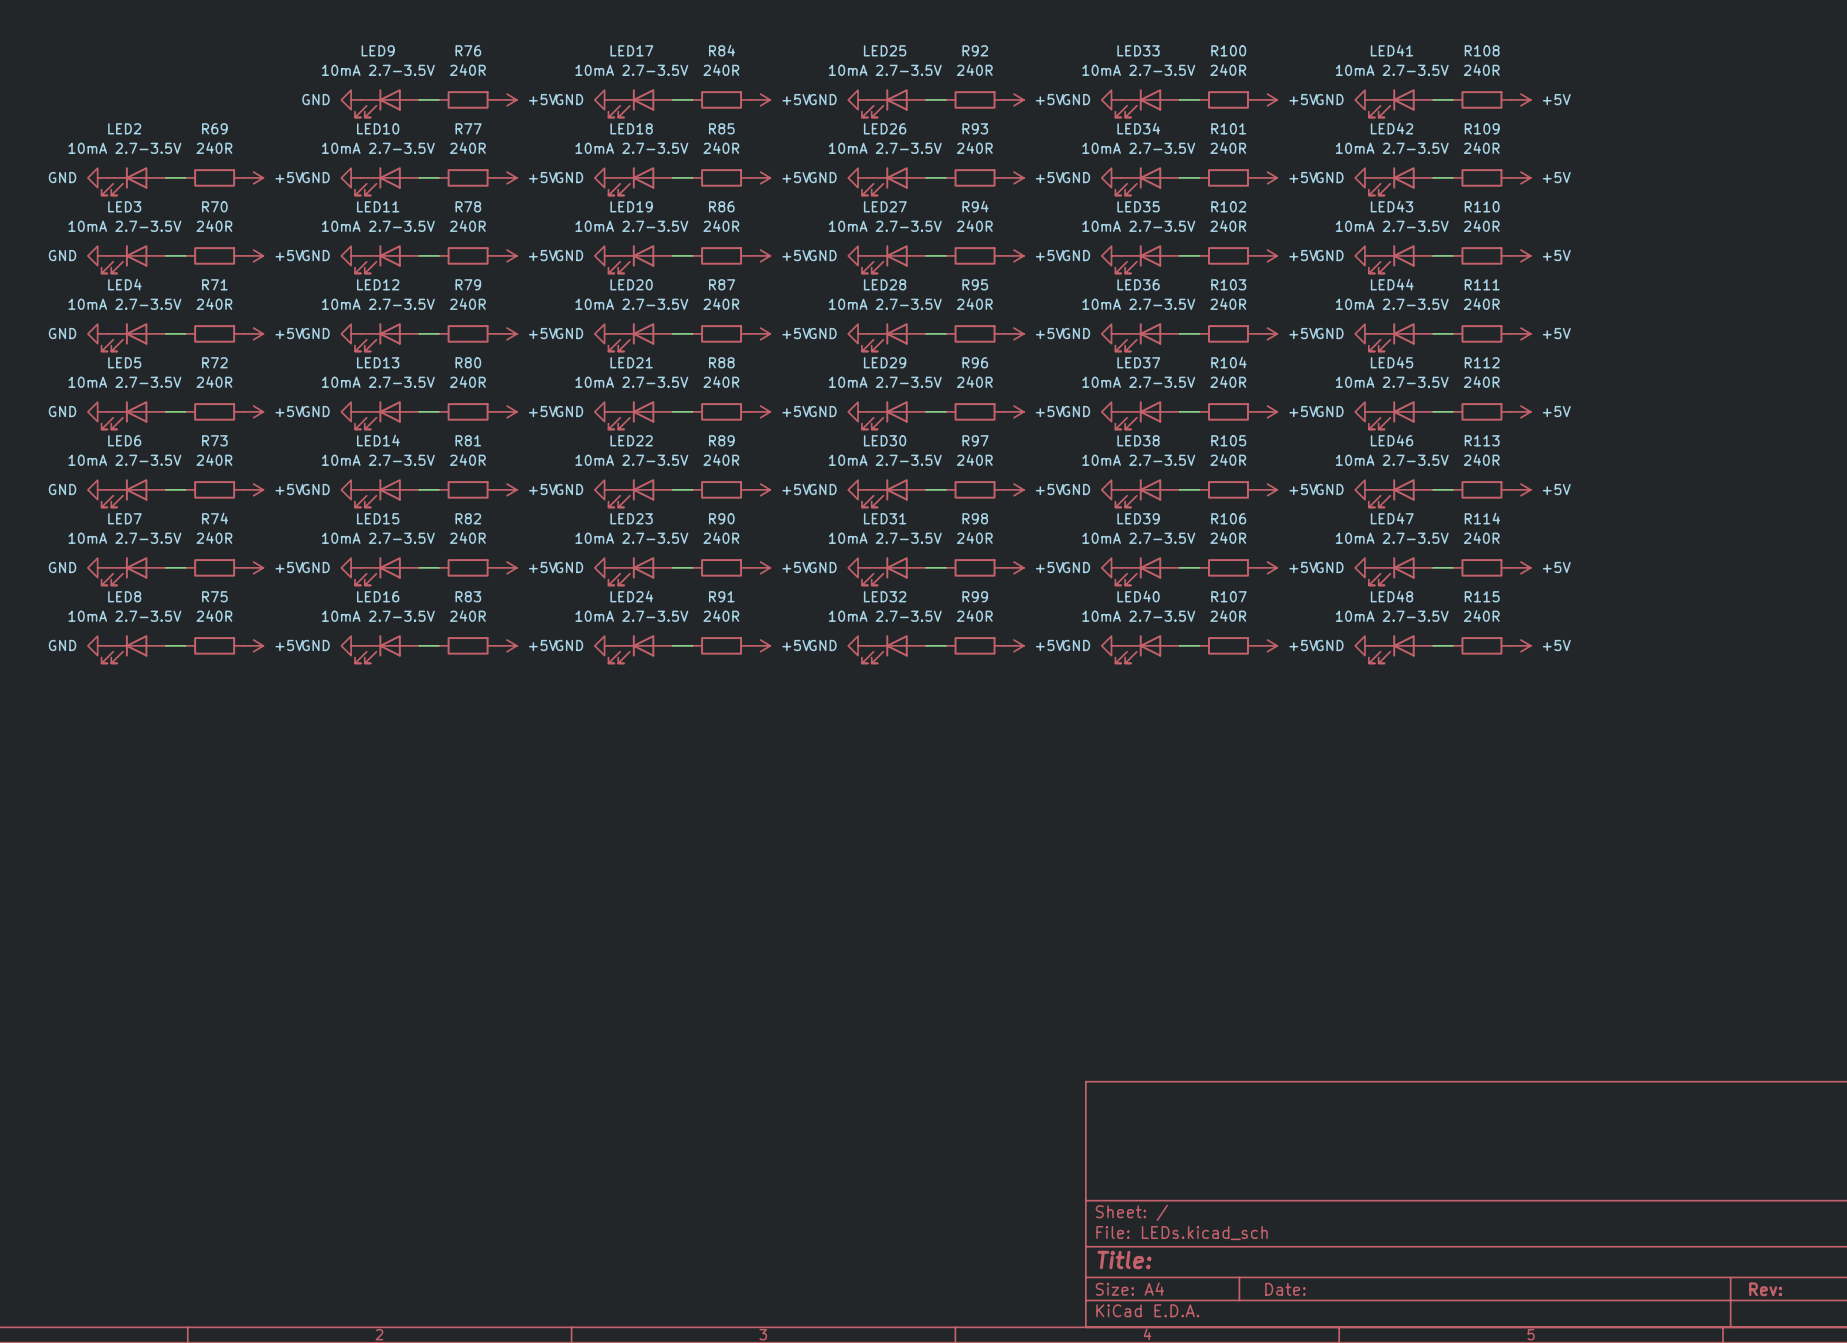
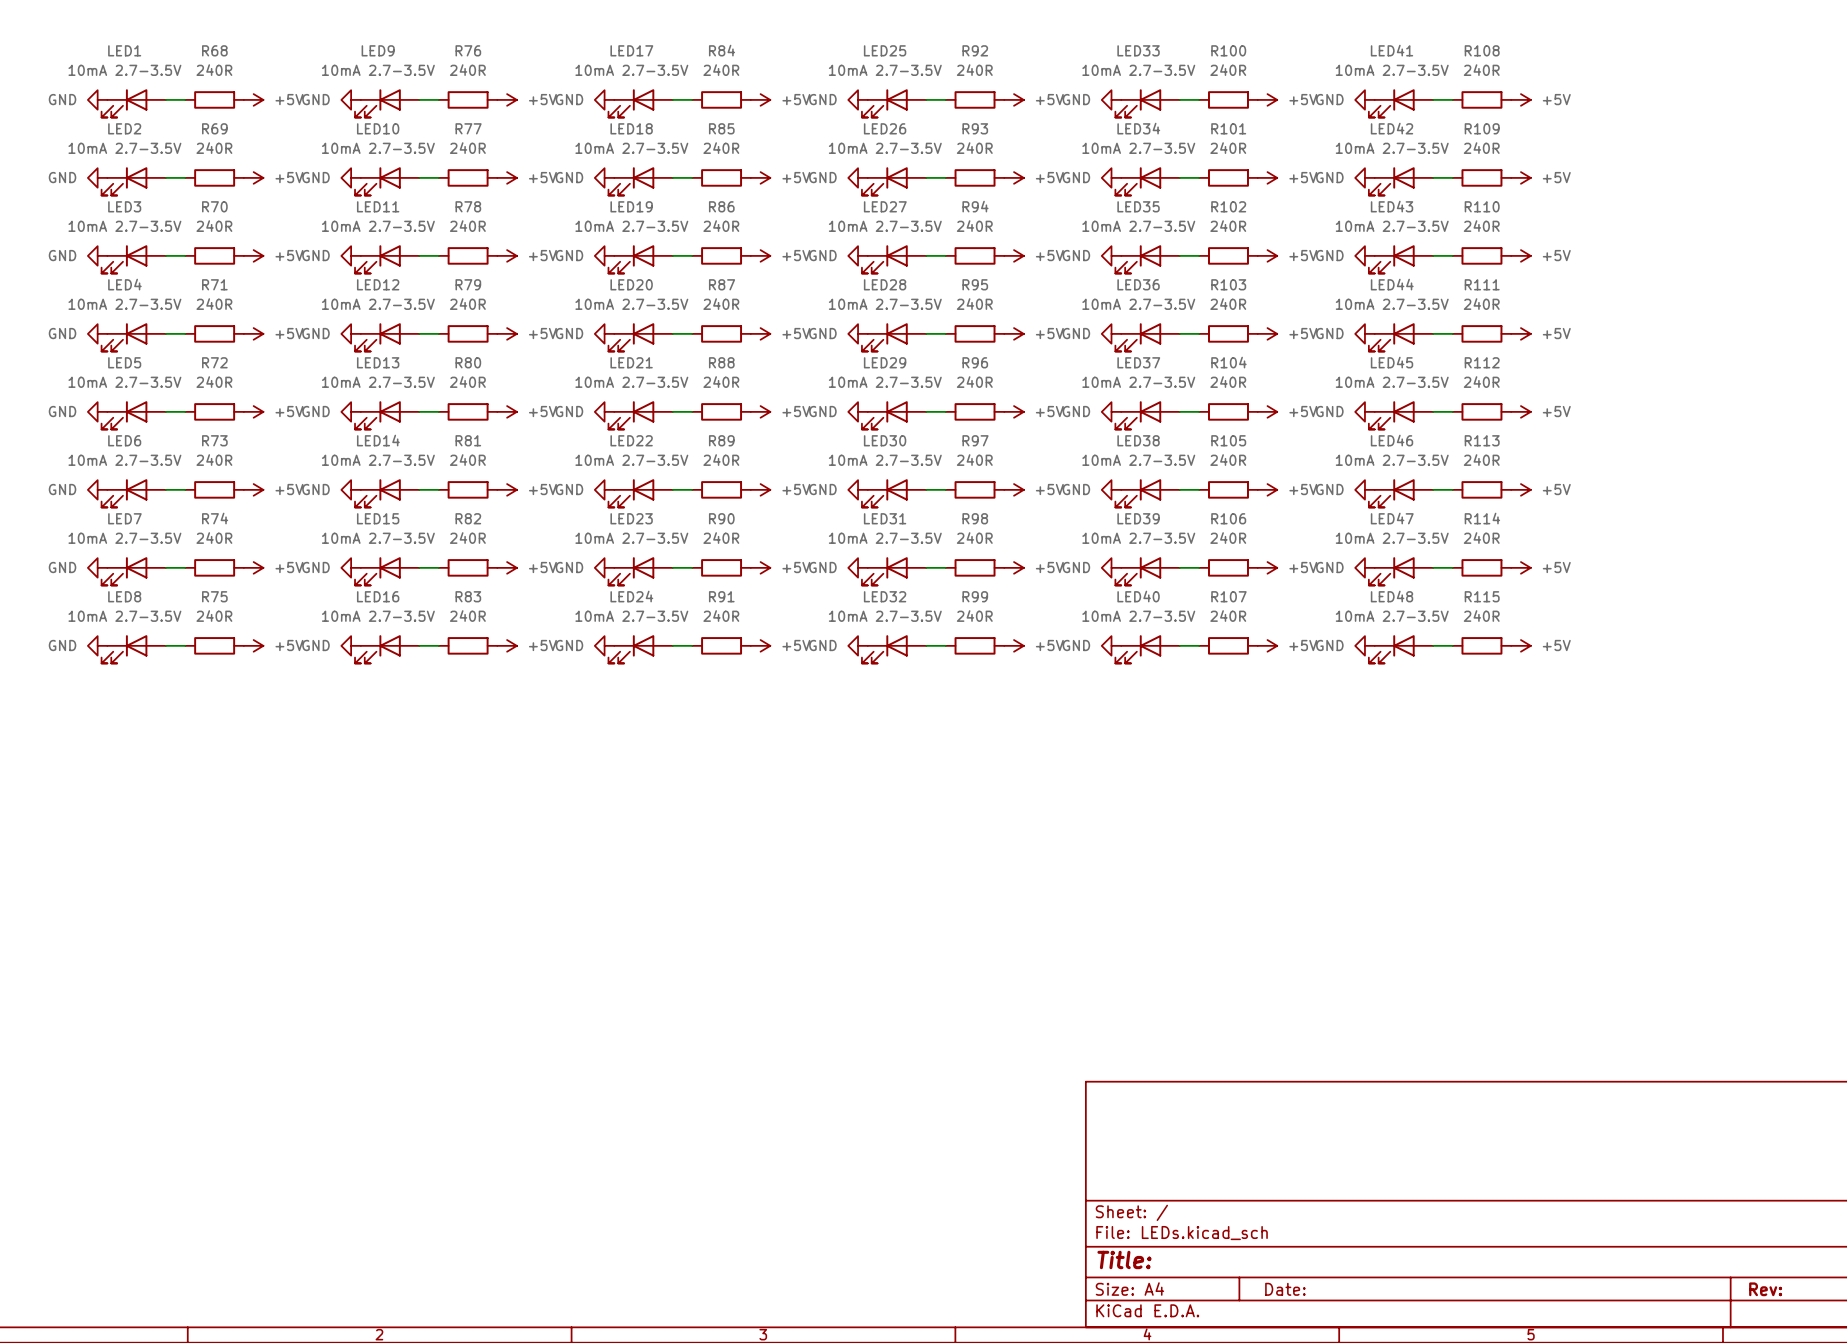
power symbol: none -> GND (97, 99)
wire: none -> (165, 99) (185, 99)
R68: none -> 240R (214, 99)
power symbol: none -> +5V (253, 99)
LED1: none -> 10mA 2.7-3.5V (133, 103)

